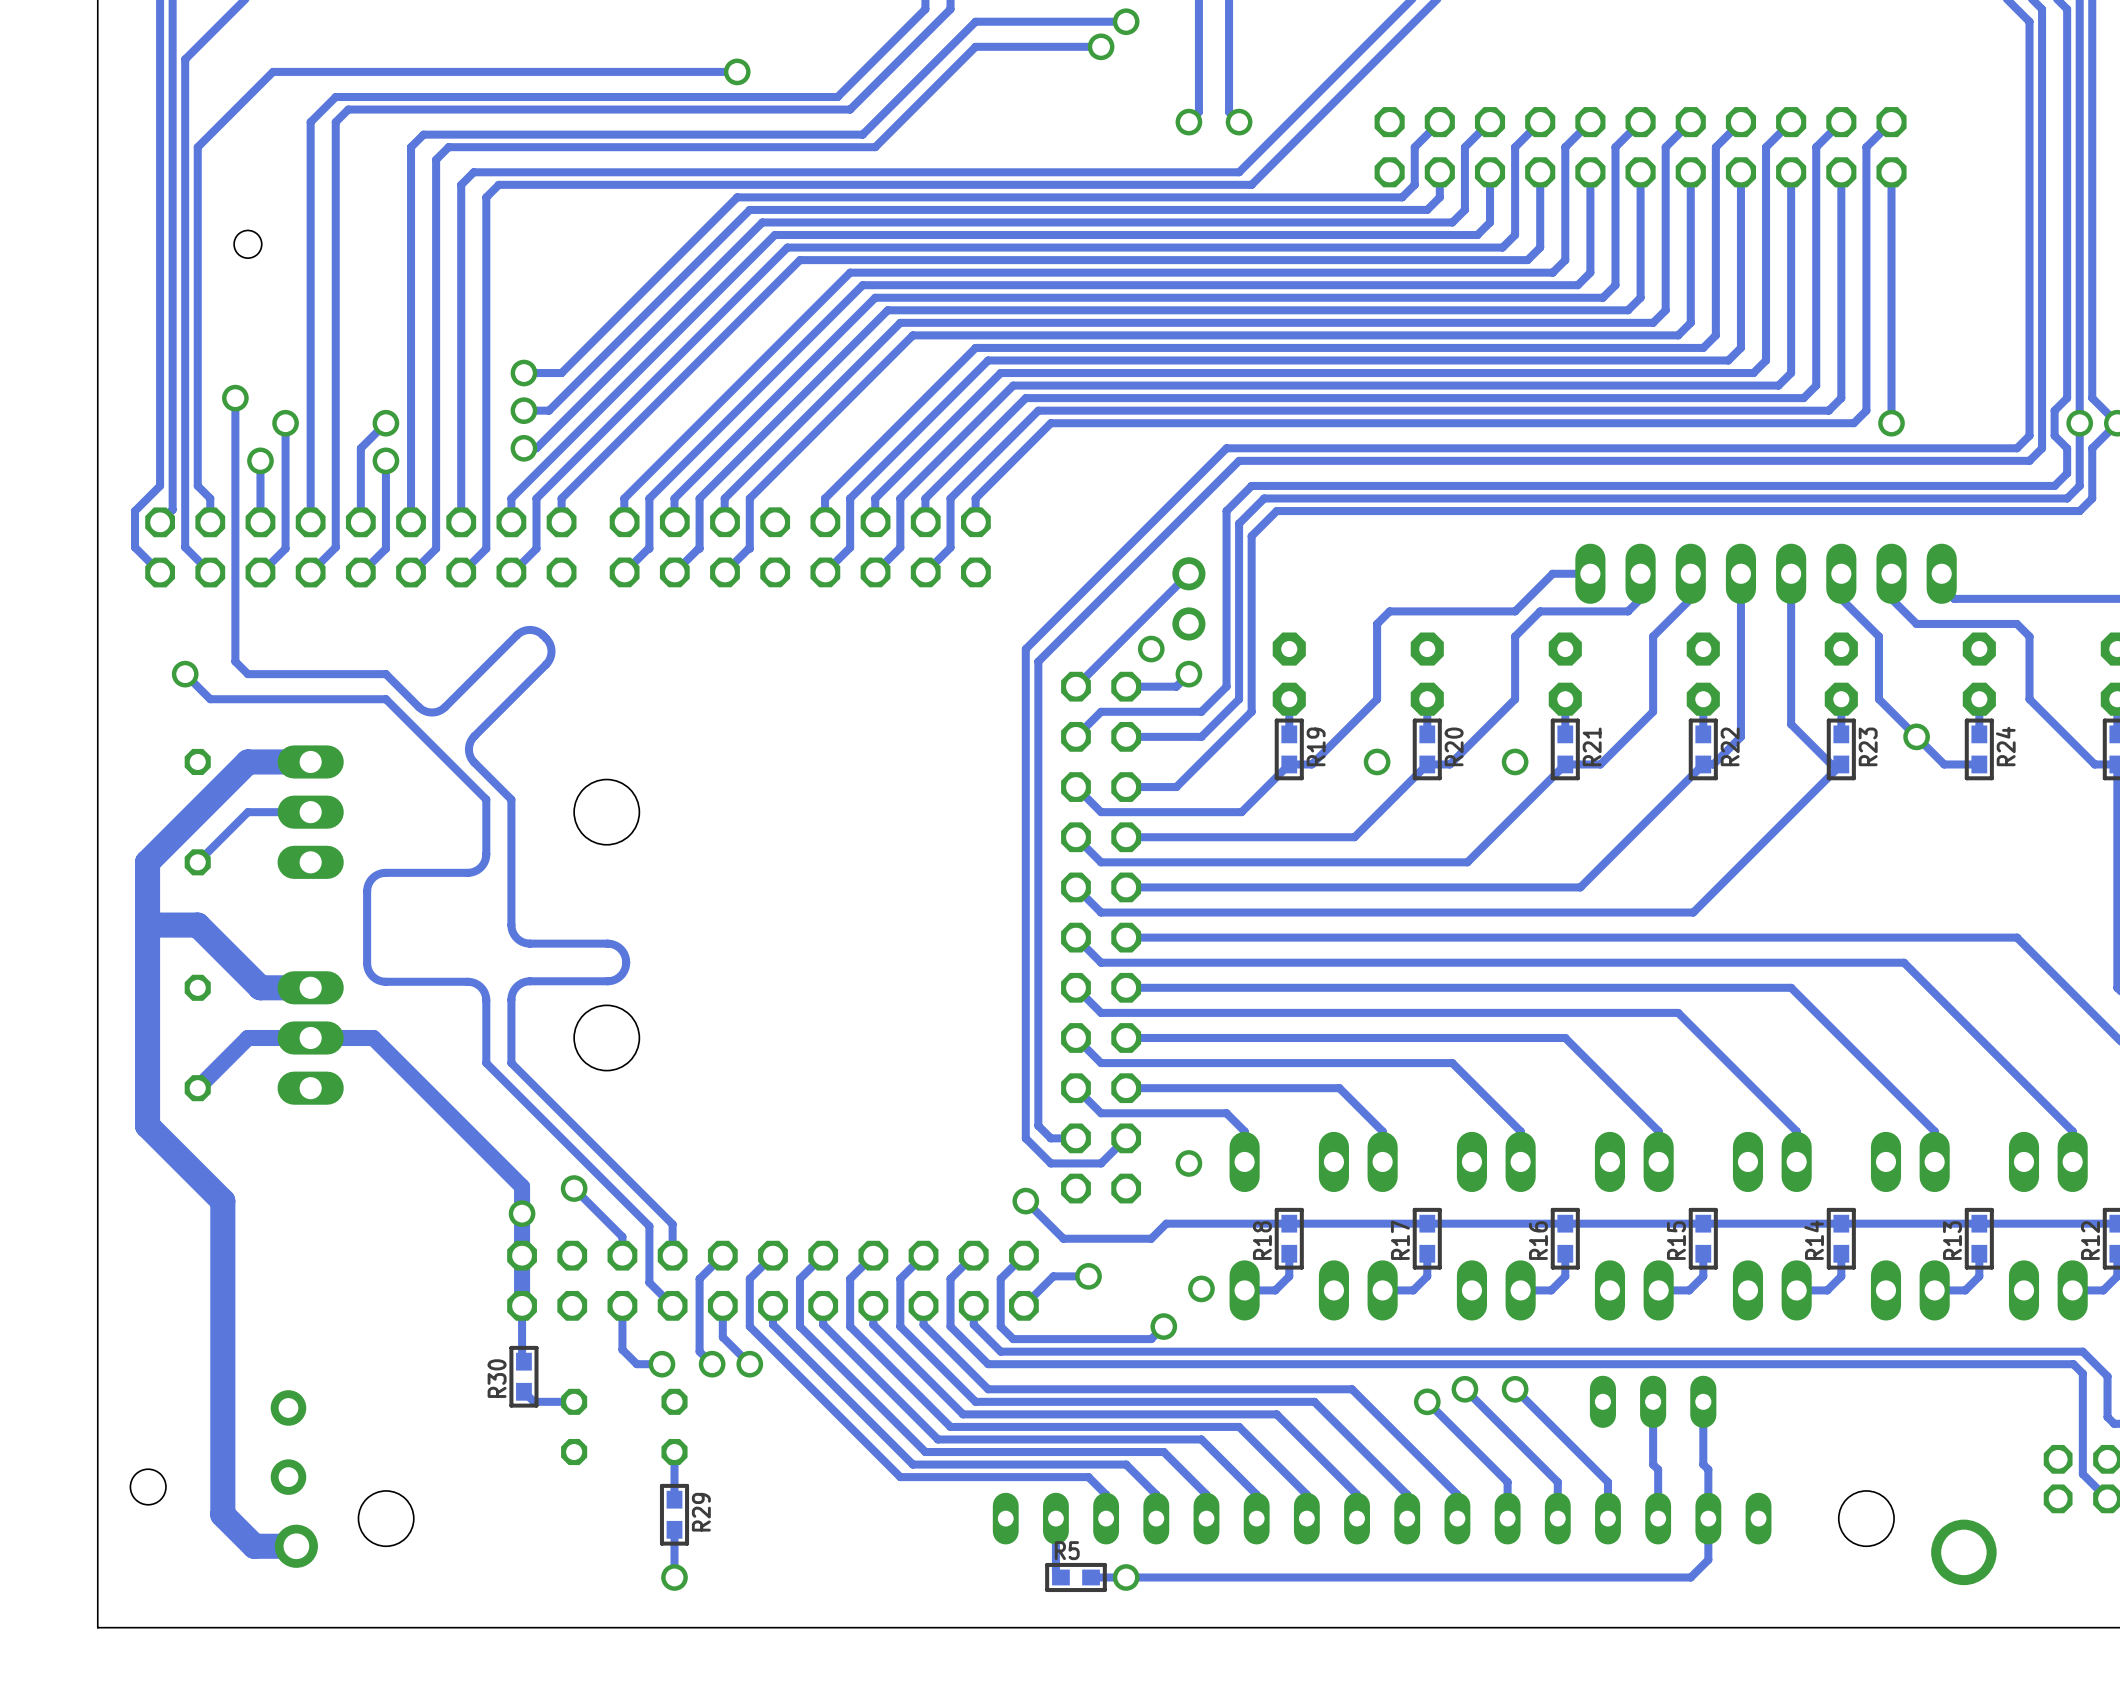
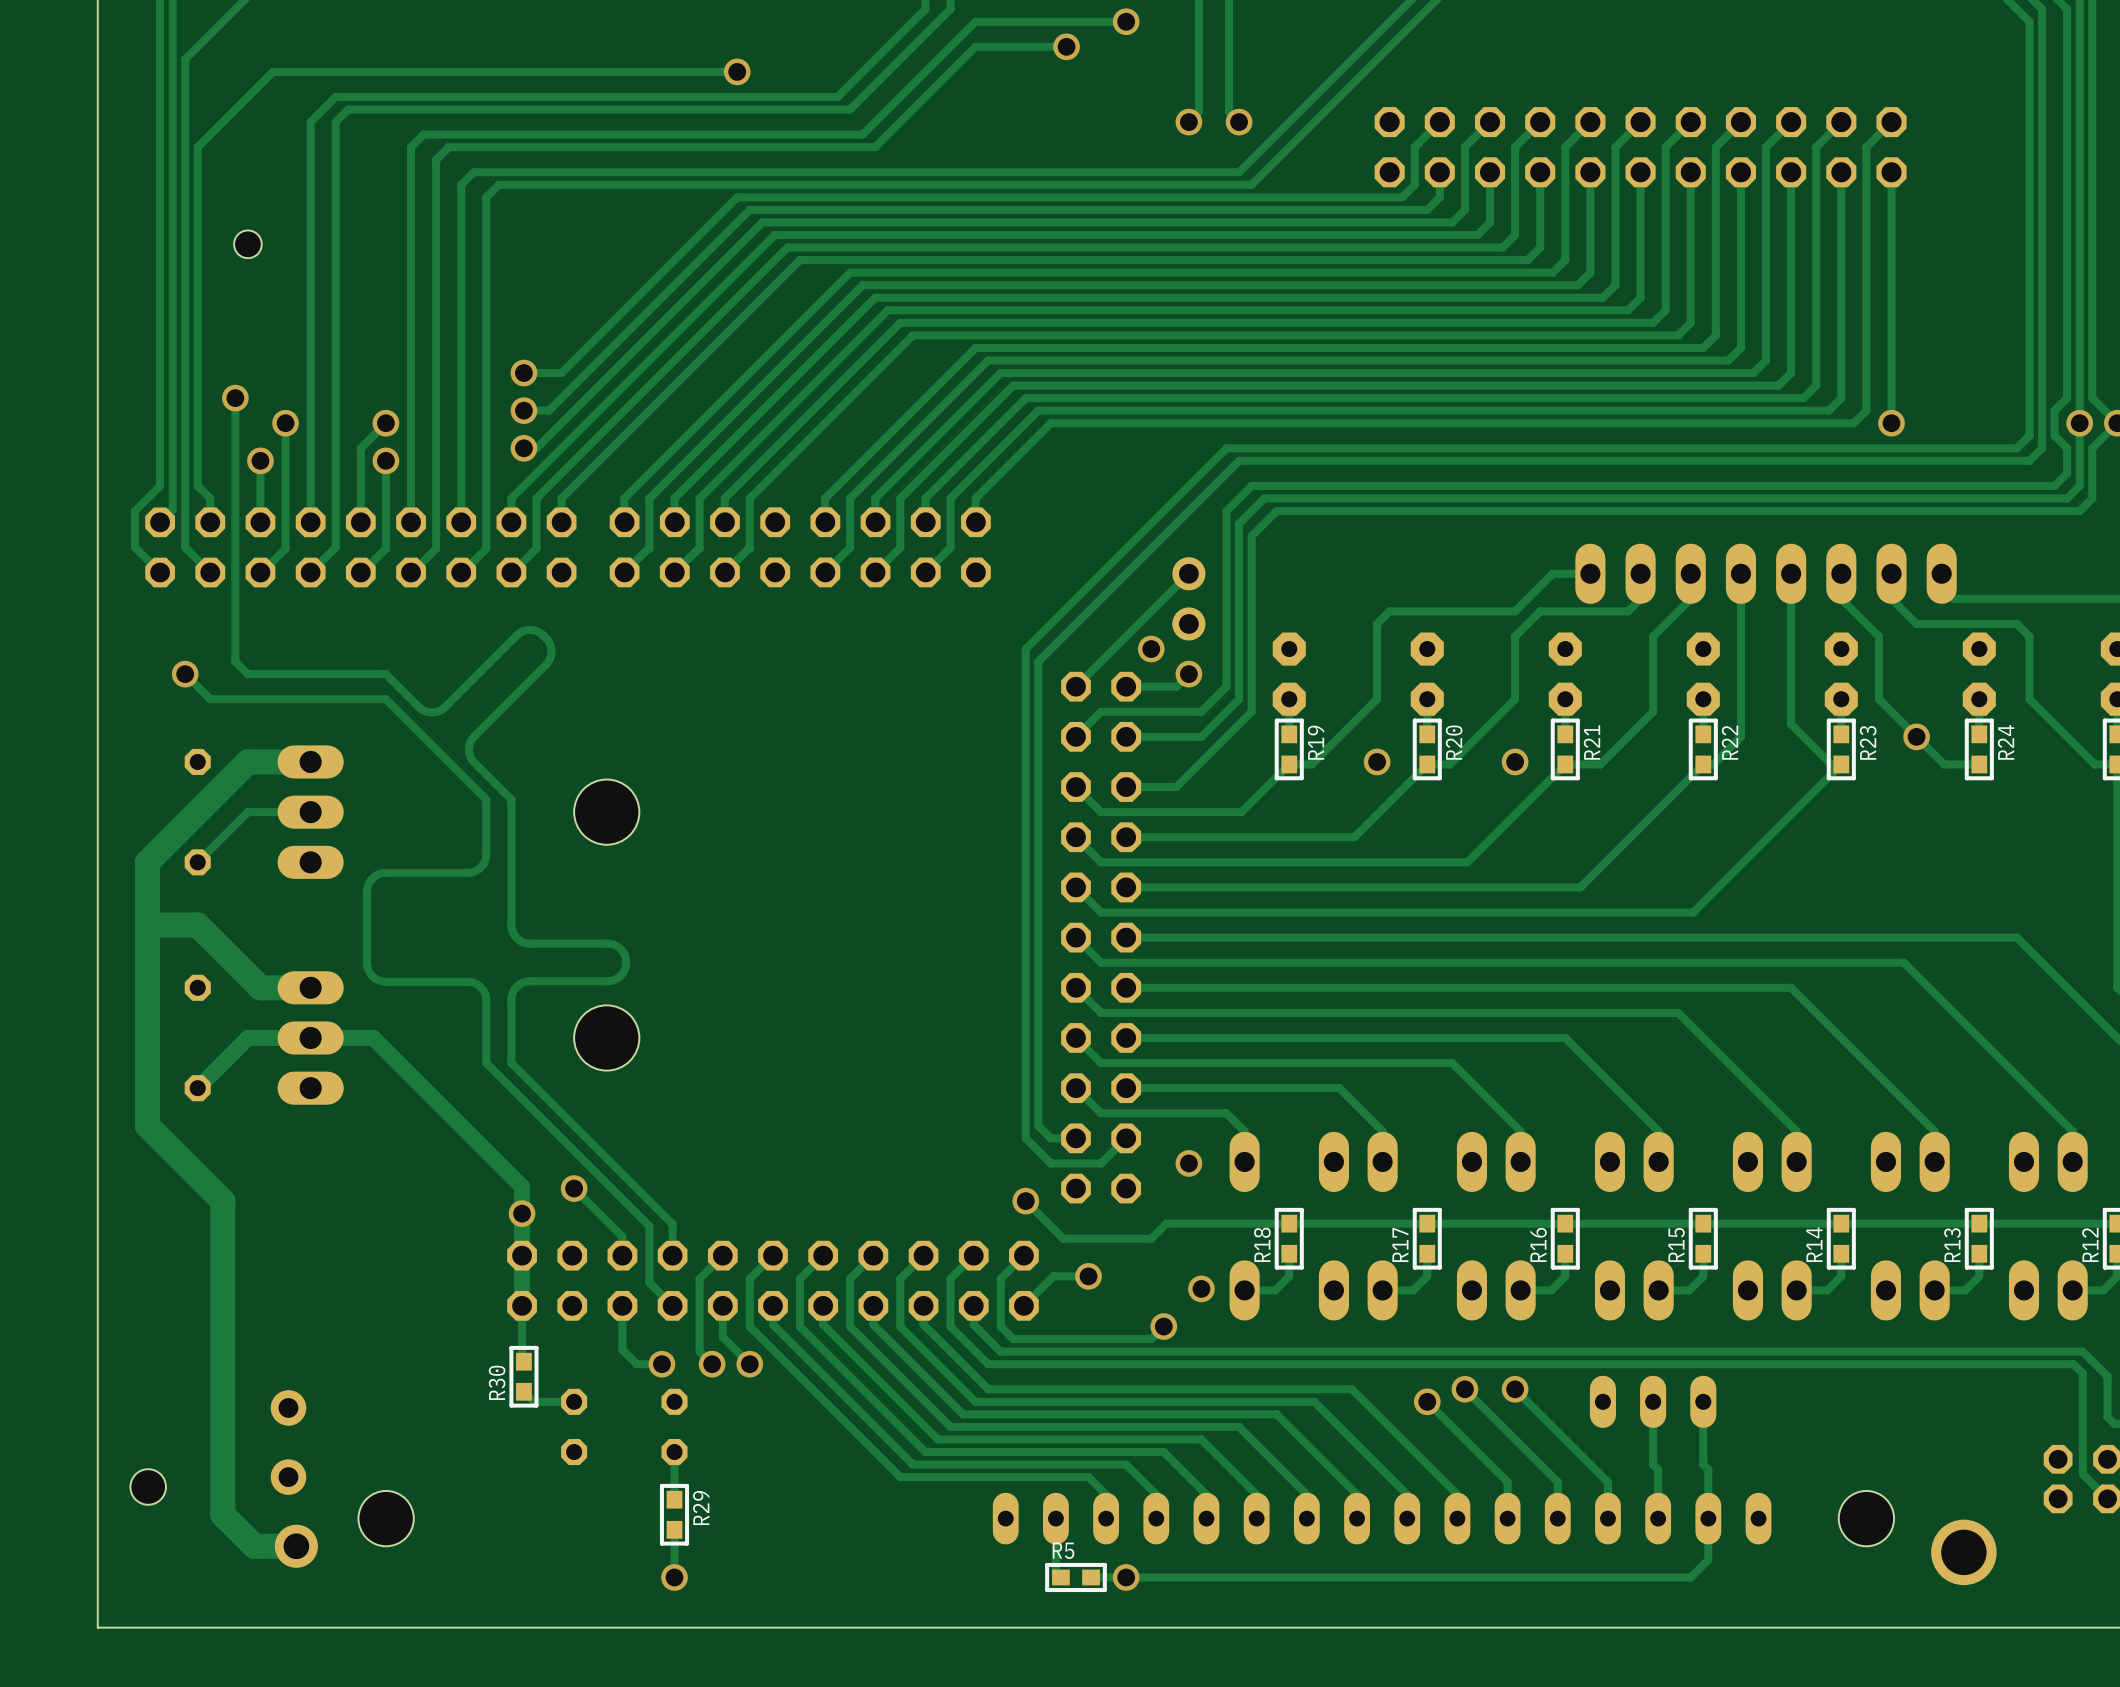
track: (1101, 46) (1066, 46) -> none
via position: (1101, 46) -> (1066, 46)

